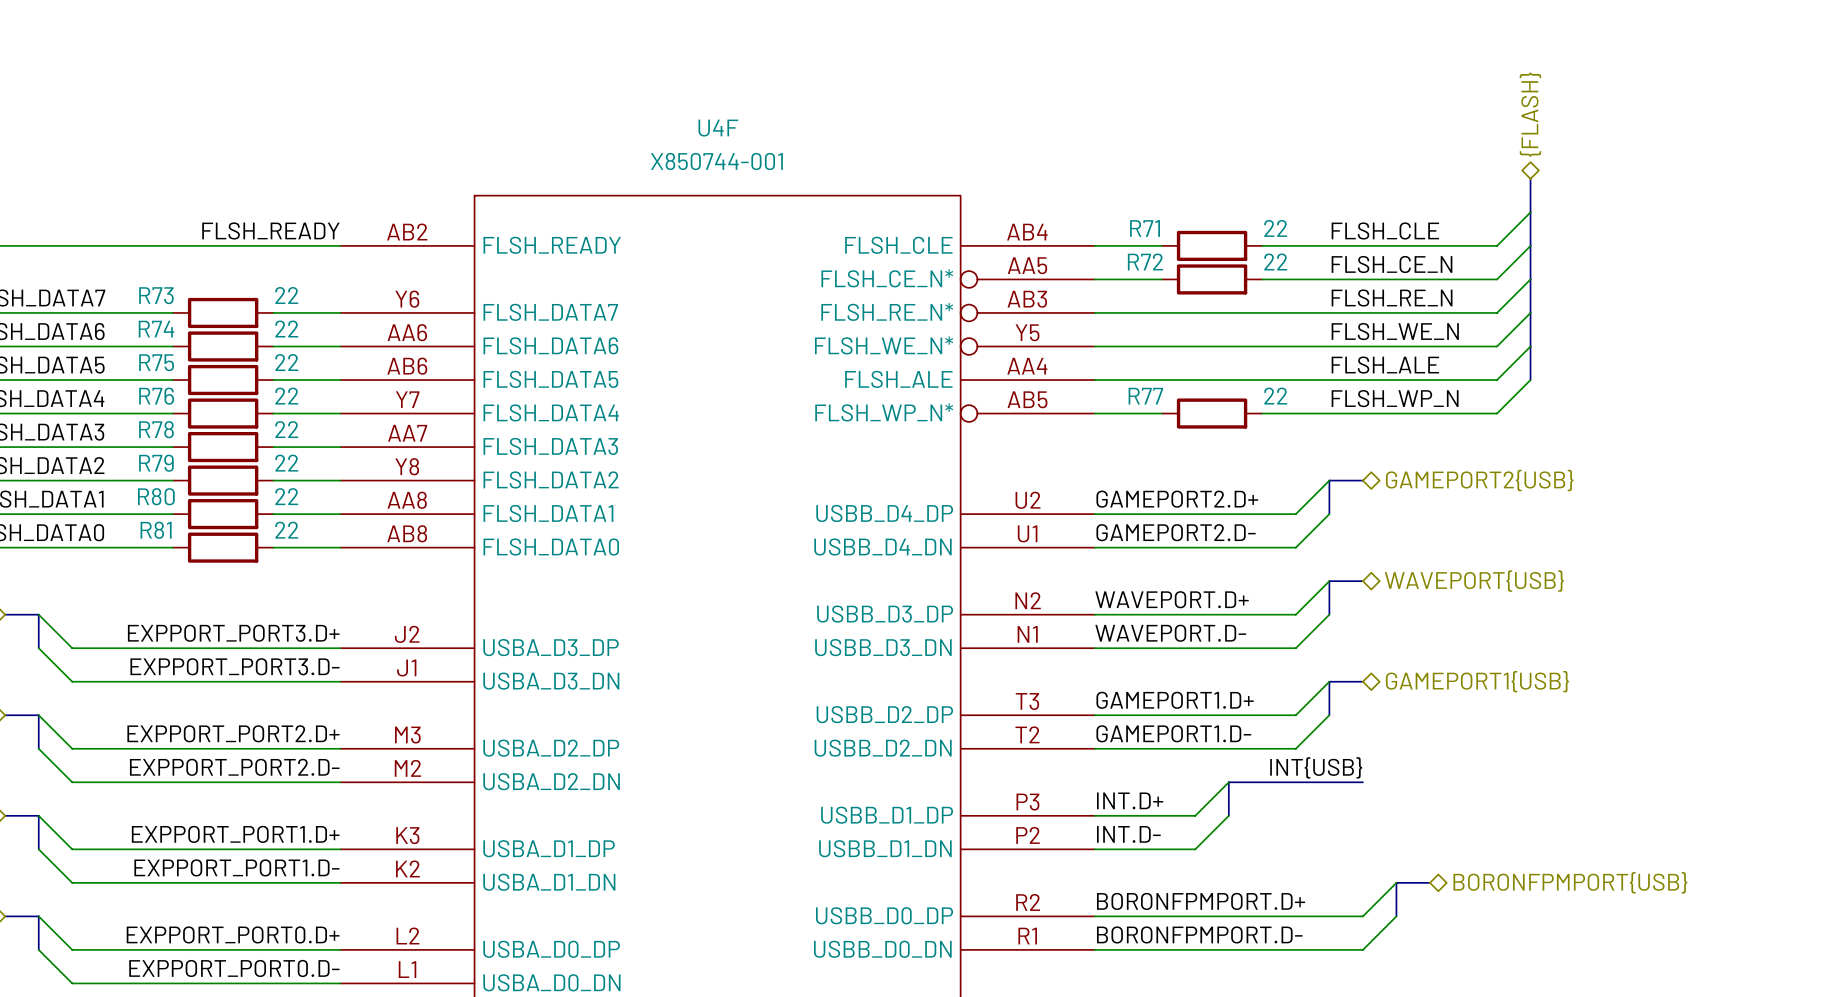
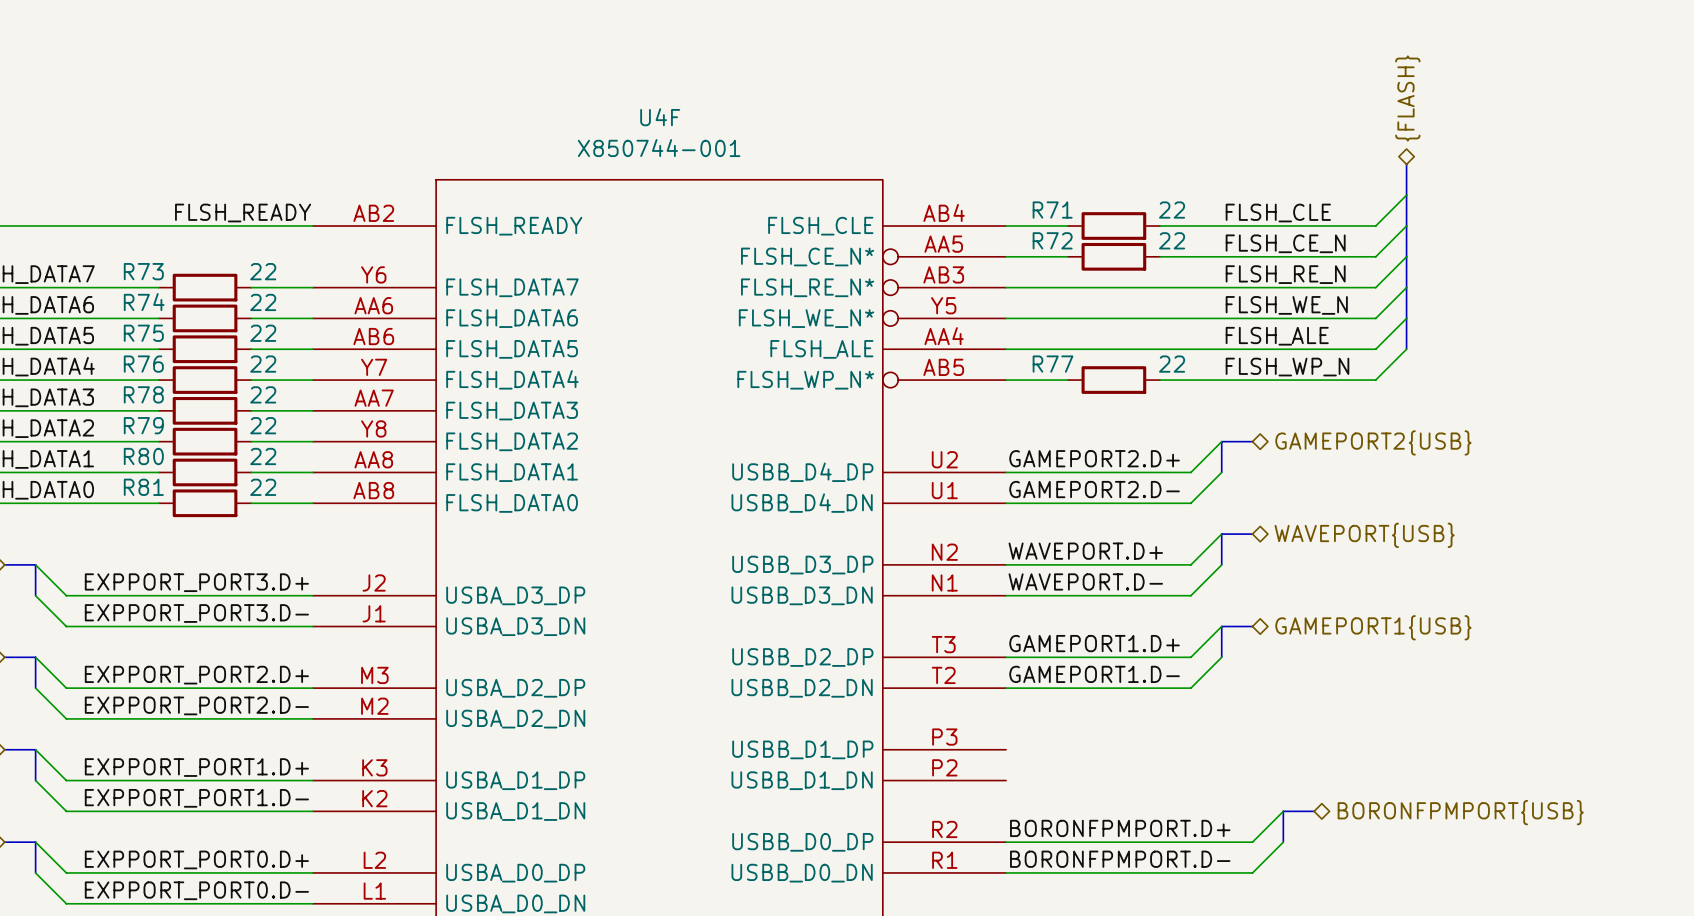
label: INT{USB} (1316, 767) -> none
wire: (1228, 782) (1195, 815) (1094, 815) -> none
bus: (1362, 782) (1228, 782) (1228, 815) -> none
label: INT.D+ (1130, 800) -> none
wire: (1228, 815) (1195, 849) (1094, 849) -> none
label: INT.D- (1128, 834) -> none

